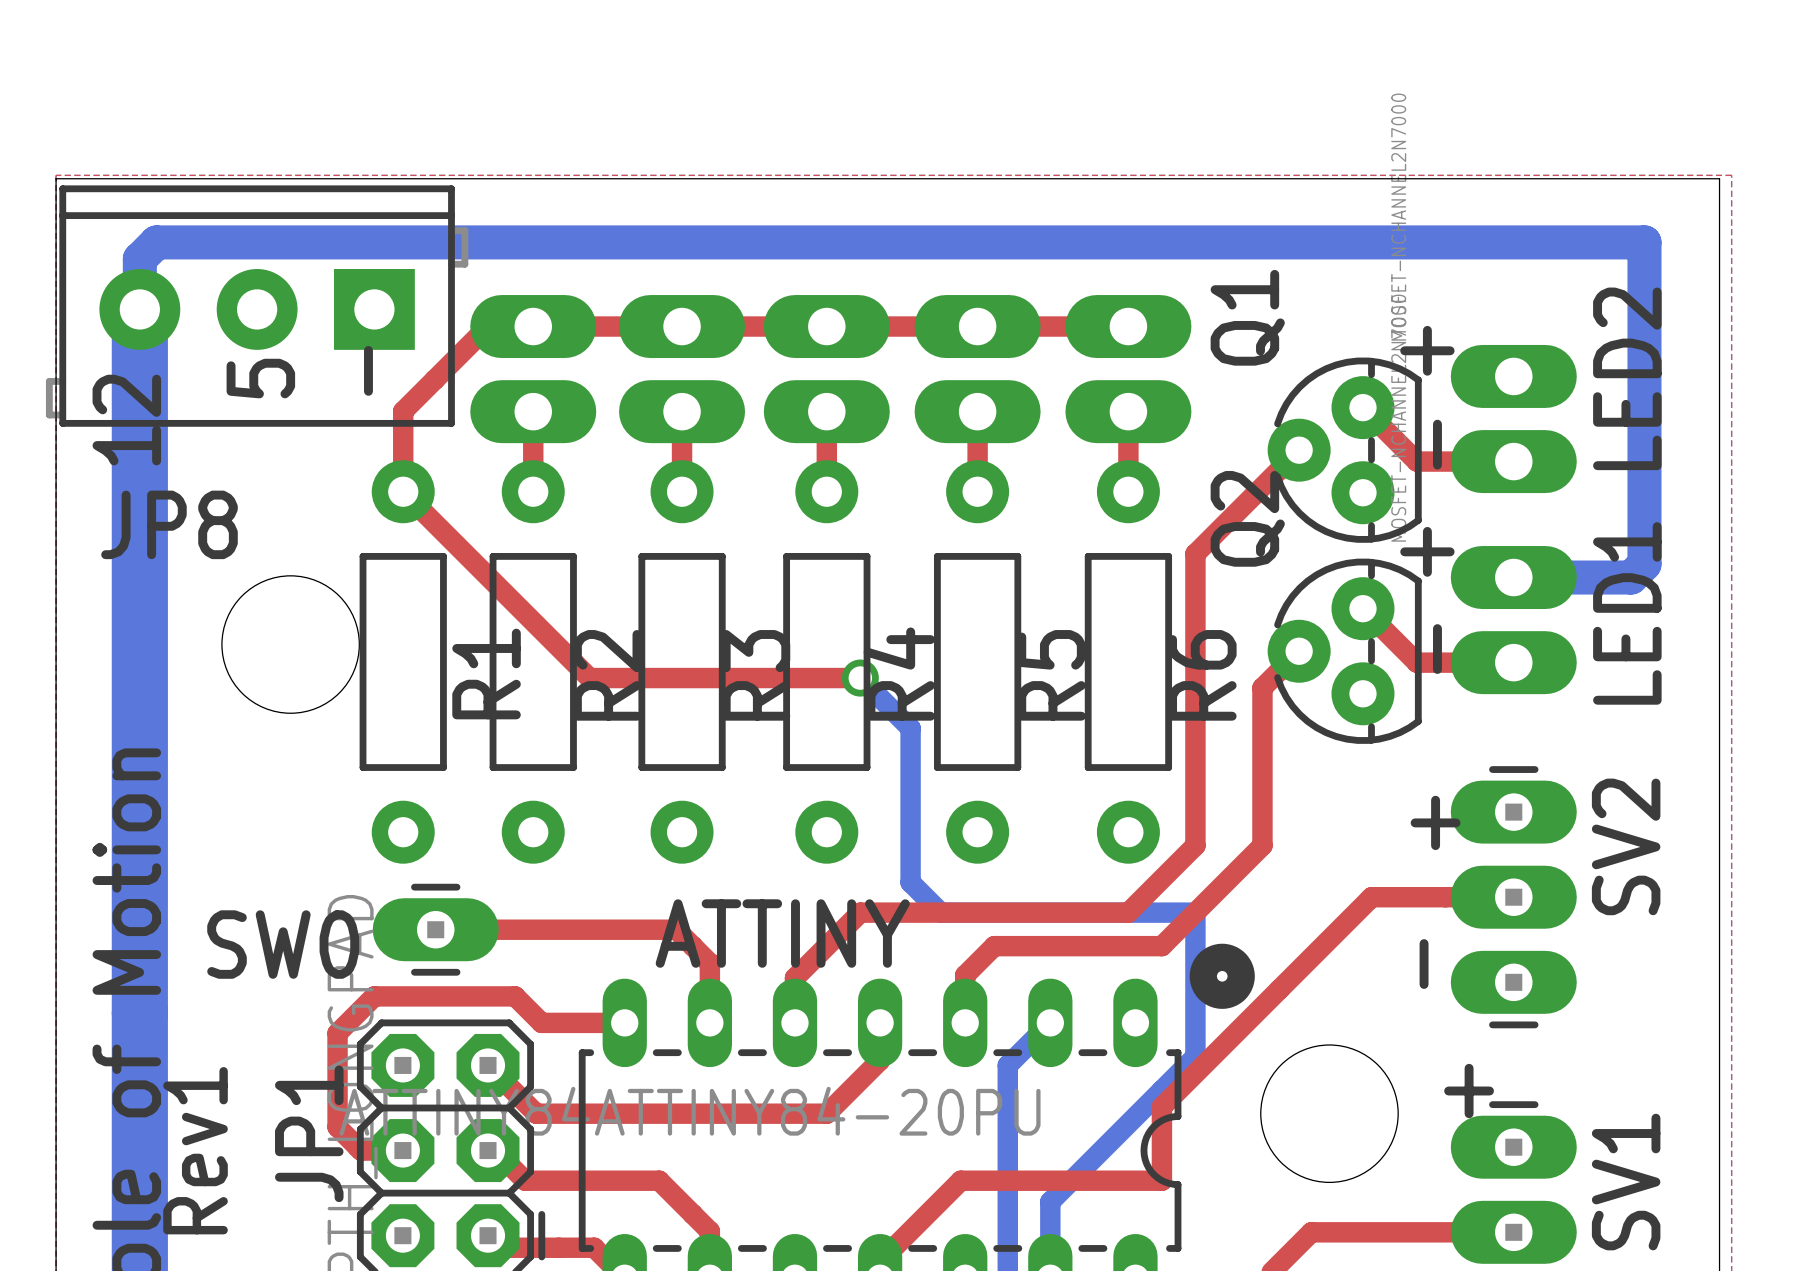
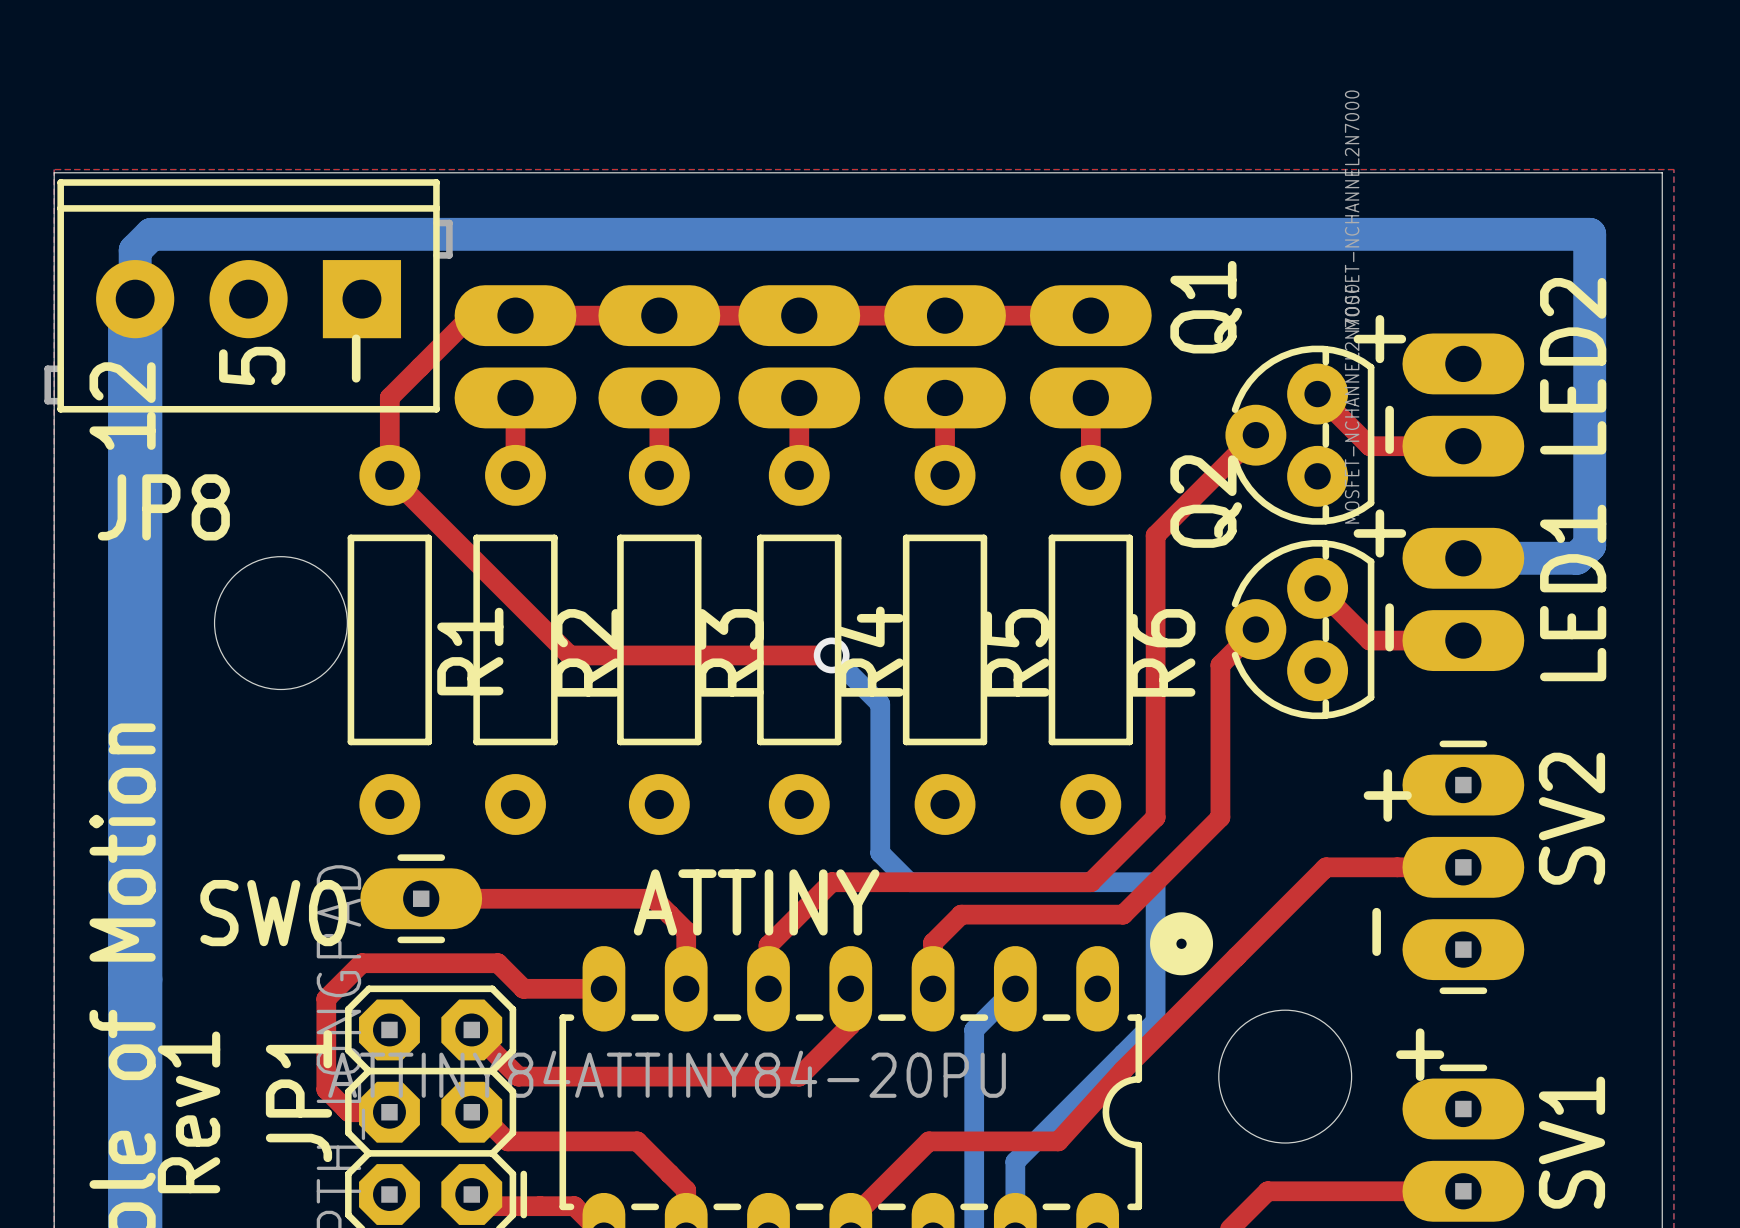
top track: (1161, 1106) (1161, 1180) (1094, 1180) -> (1123, 1070) (1058, 1141)

